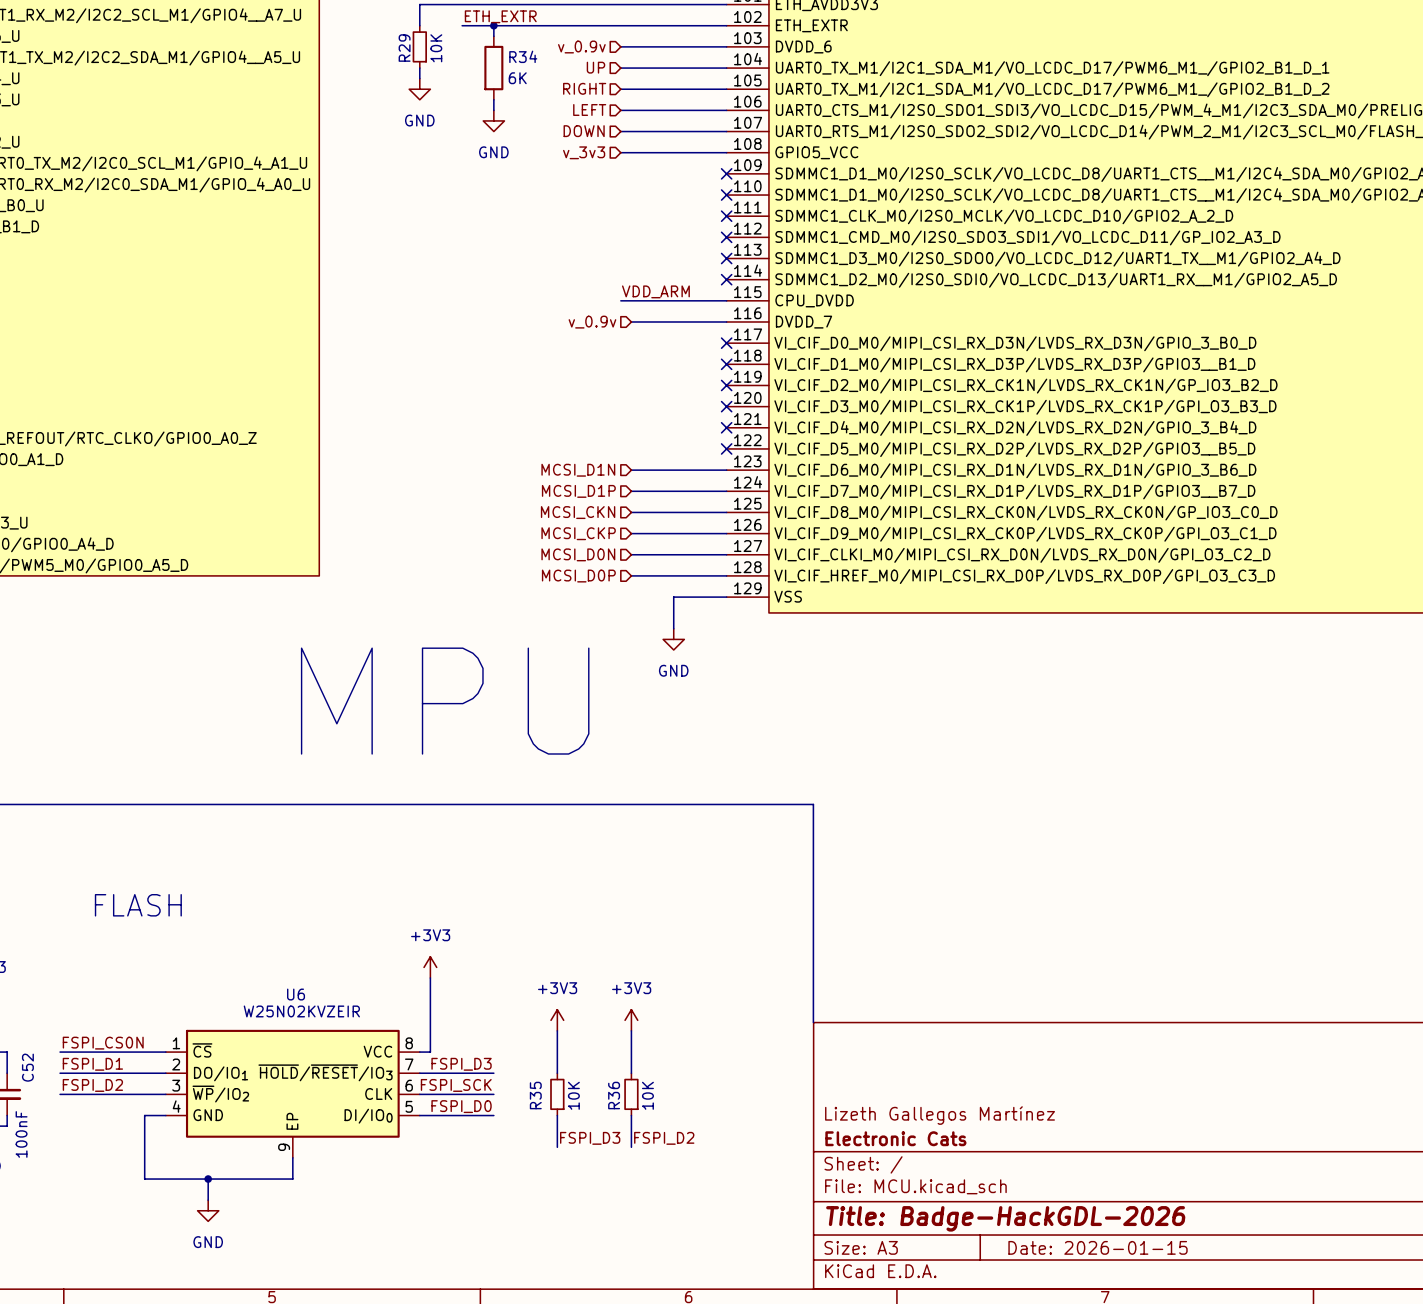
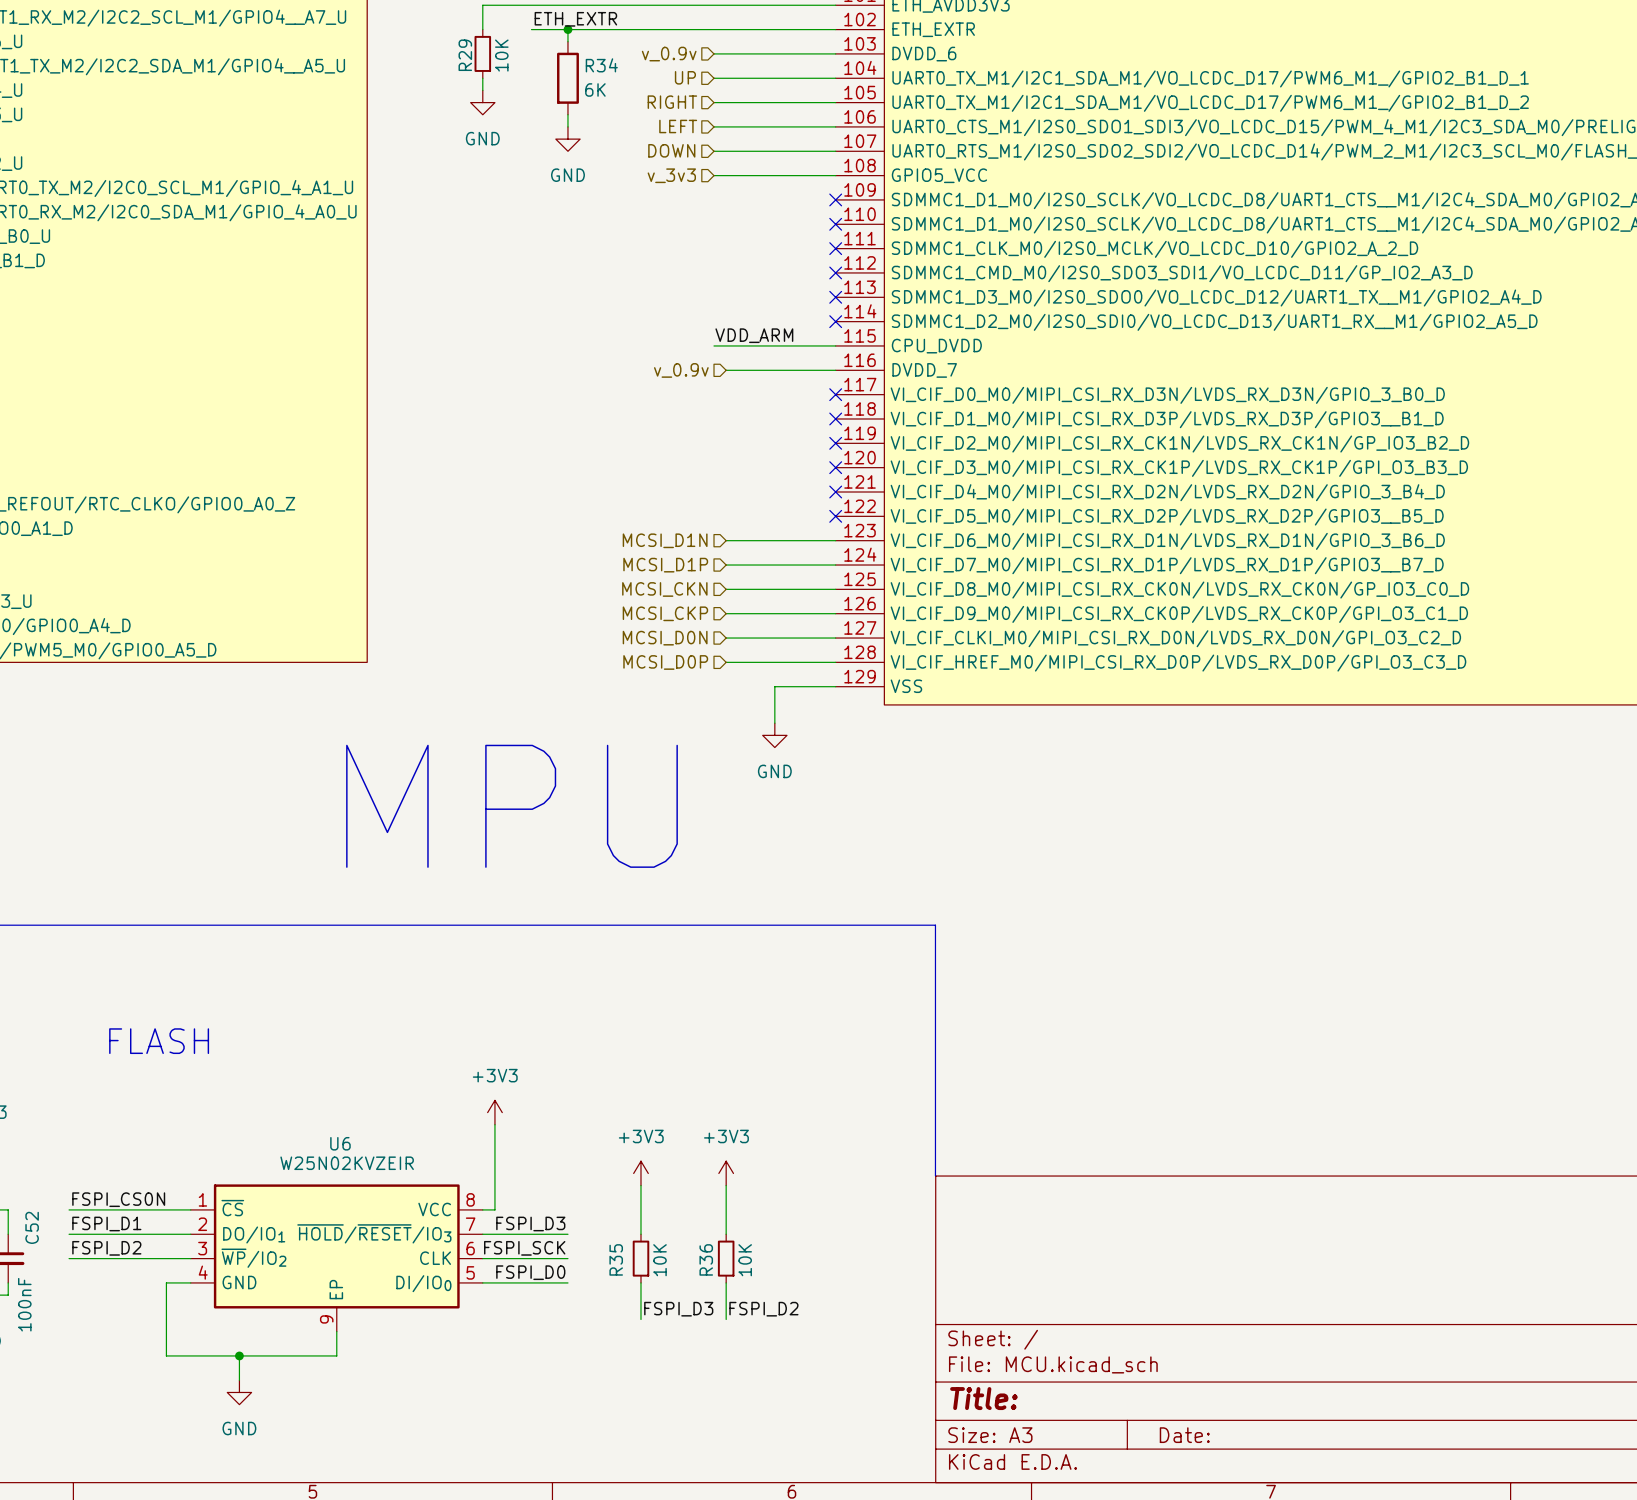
title block: Lizeth Gallegos Martínez (940, 1115) -> none
title block: Electronic Cats (895, 1138) -> none
title block: Title: Badge-HackGDL-2026 (1005, 1218) -> Title: (983, 1398)
title block: Date: 2026-01-15 (1098, 1247) -> Date: (1184, 1435)

